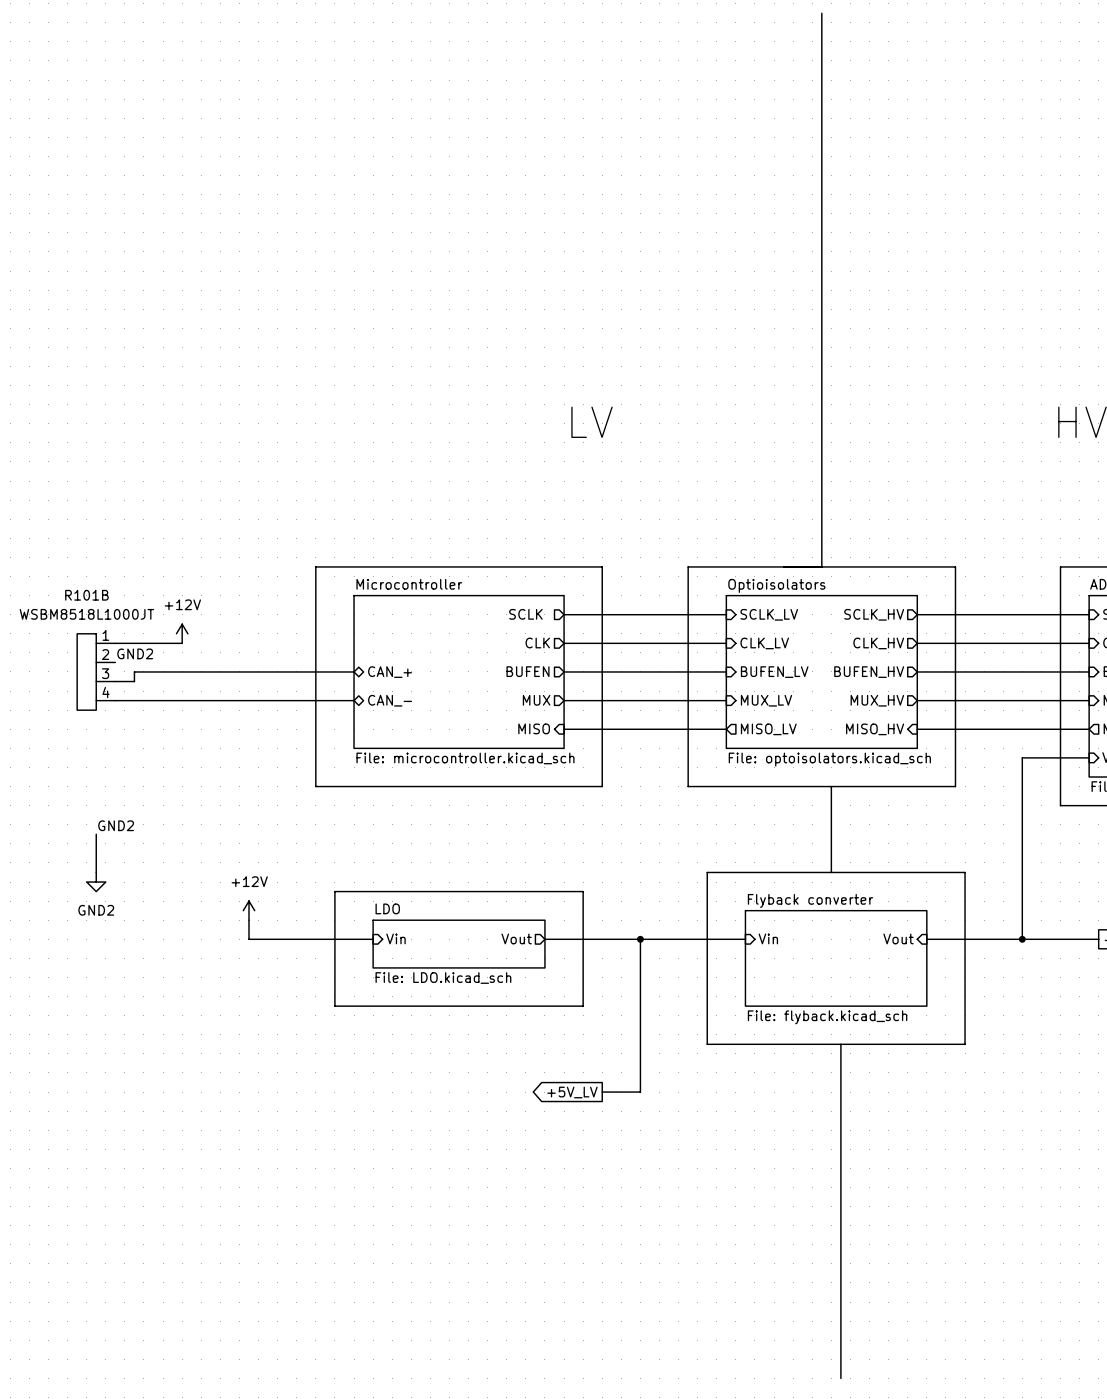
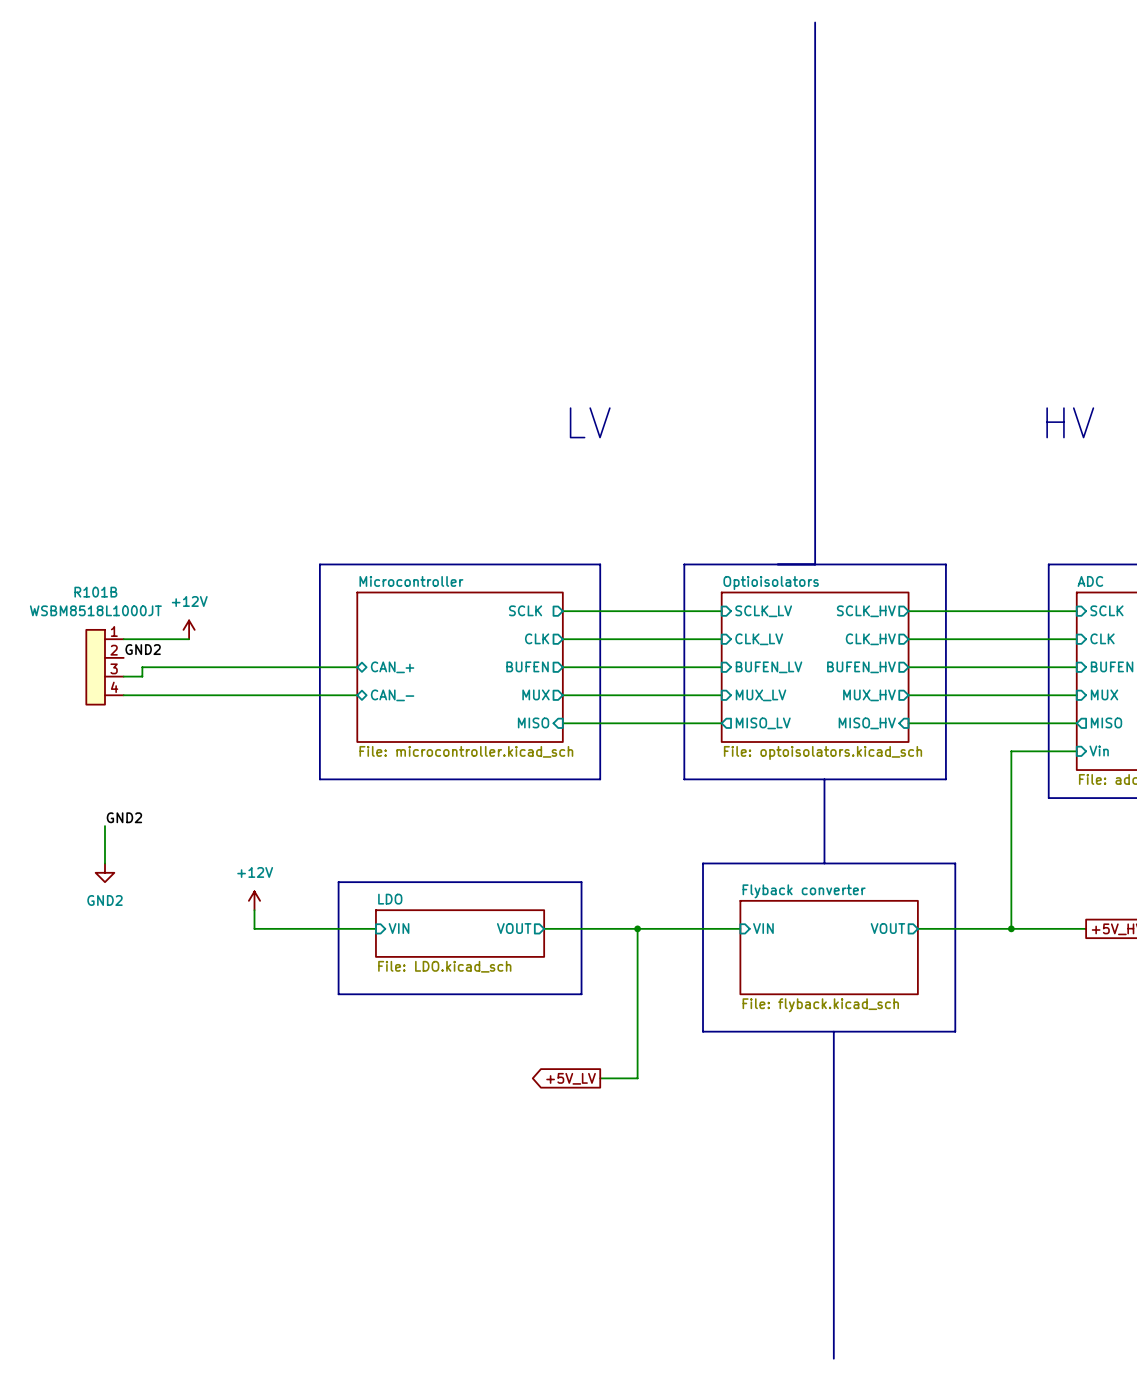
sheet pin: Vin (395, 938) -> VIN (399, 928)
sheet pin: Vout (516, 938) -> VOUT (514, 928)
sheet pin: Vin (768, 938) -> VIN (763, 928)
sheet pin shape: input (898, 938) -> output (887, 928)
sheet pin: Vout (898, 938) -> VOUT (887, 928)

